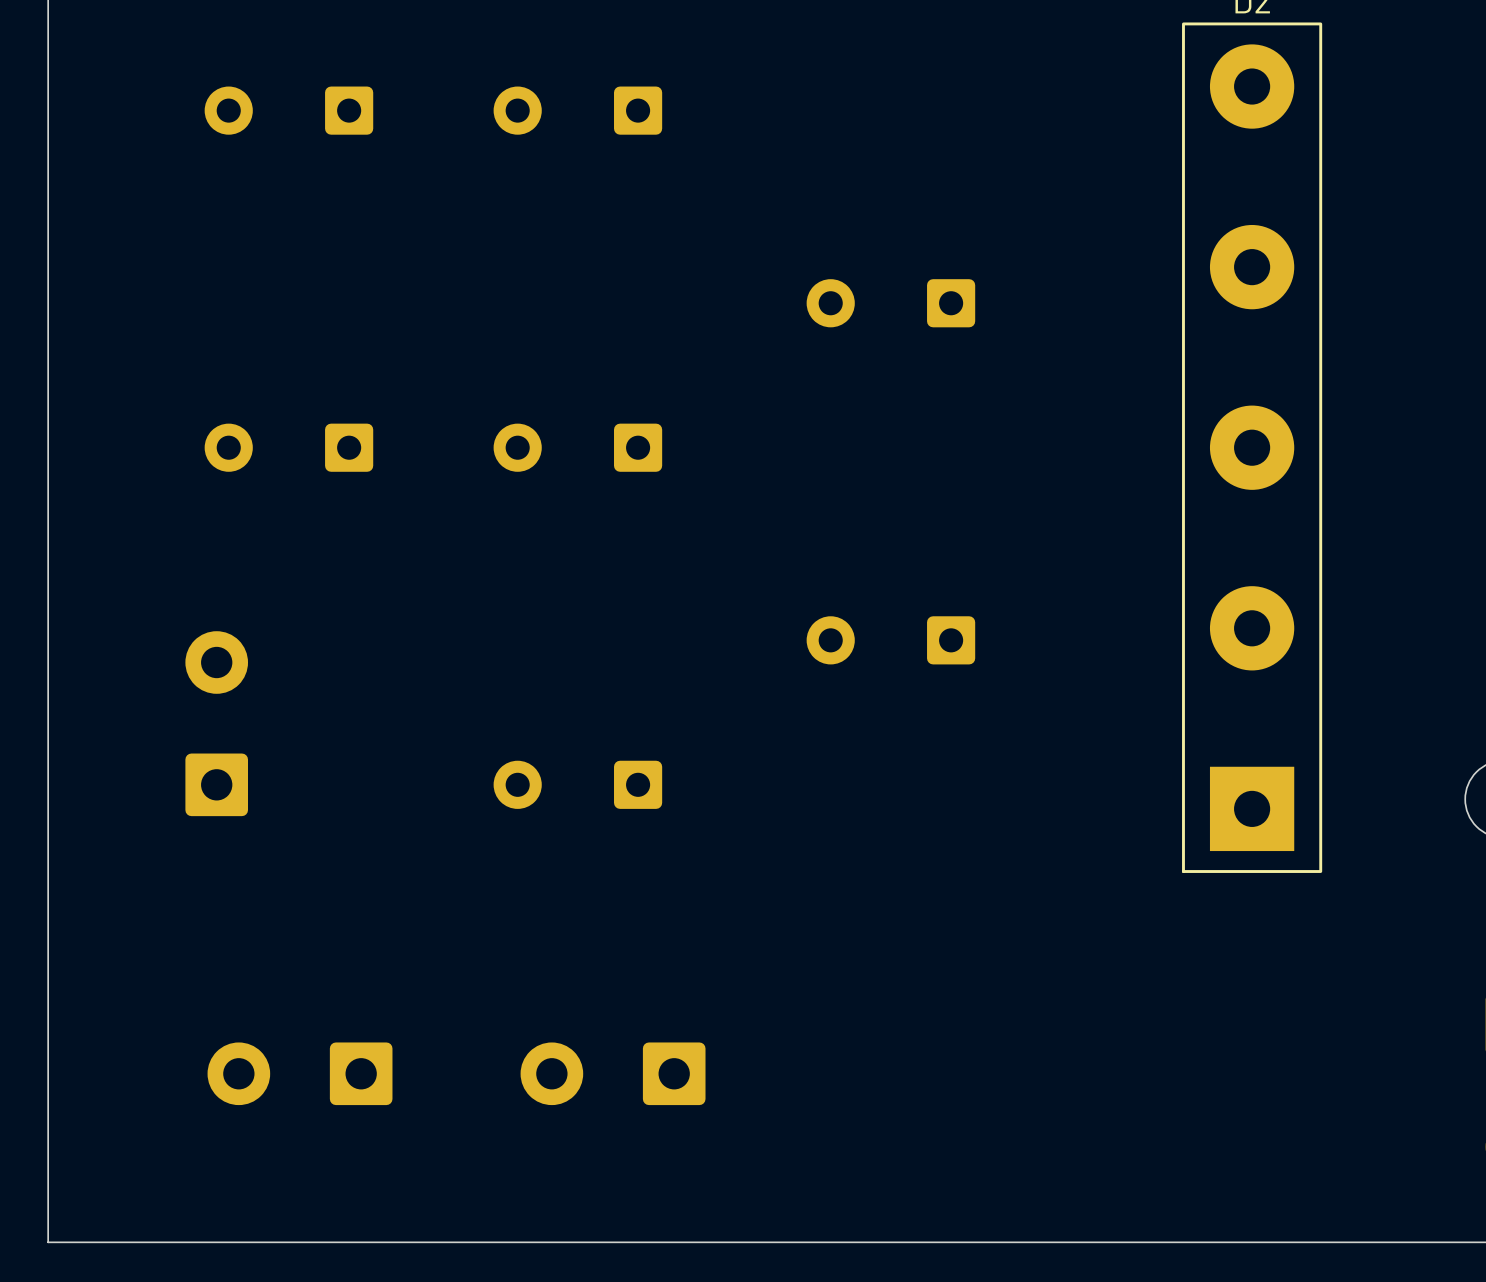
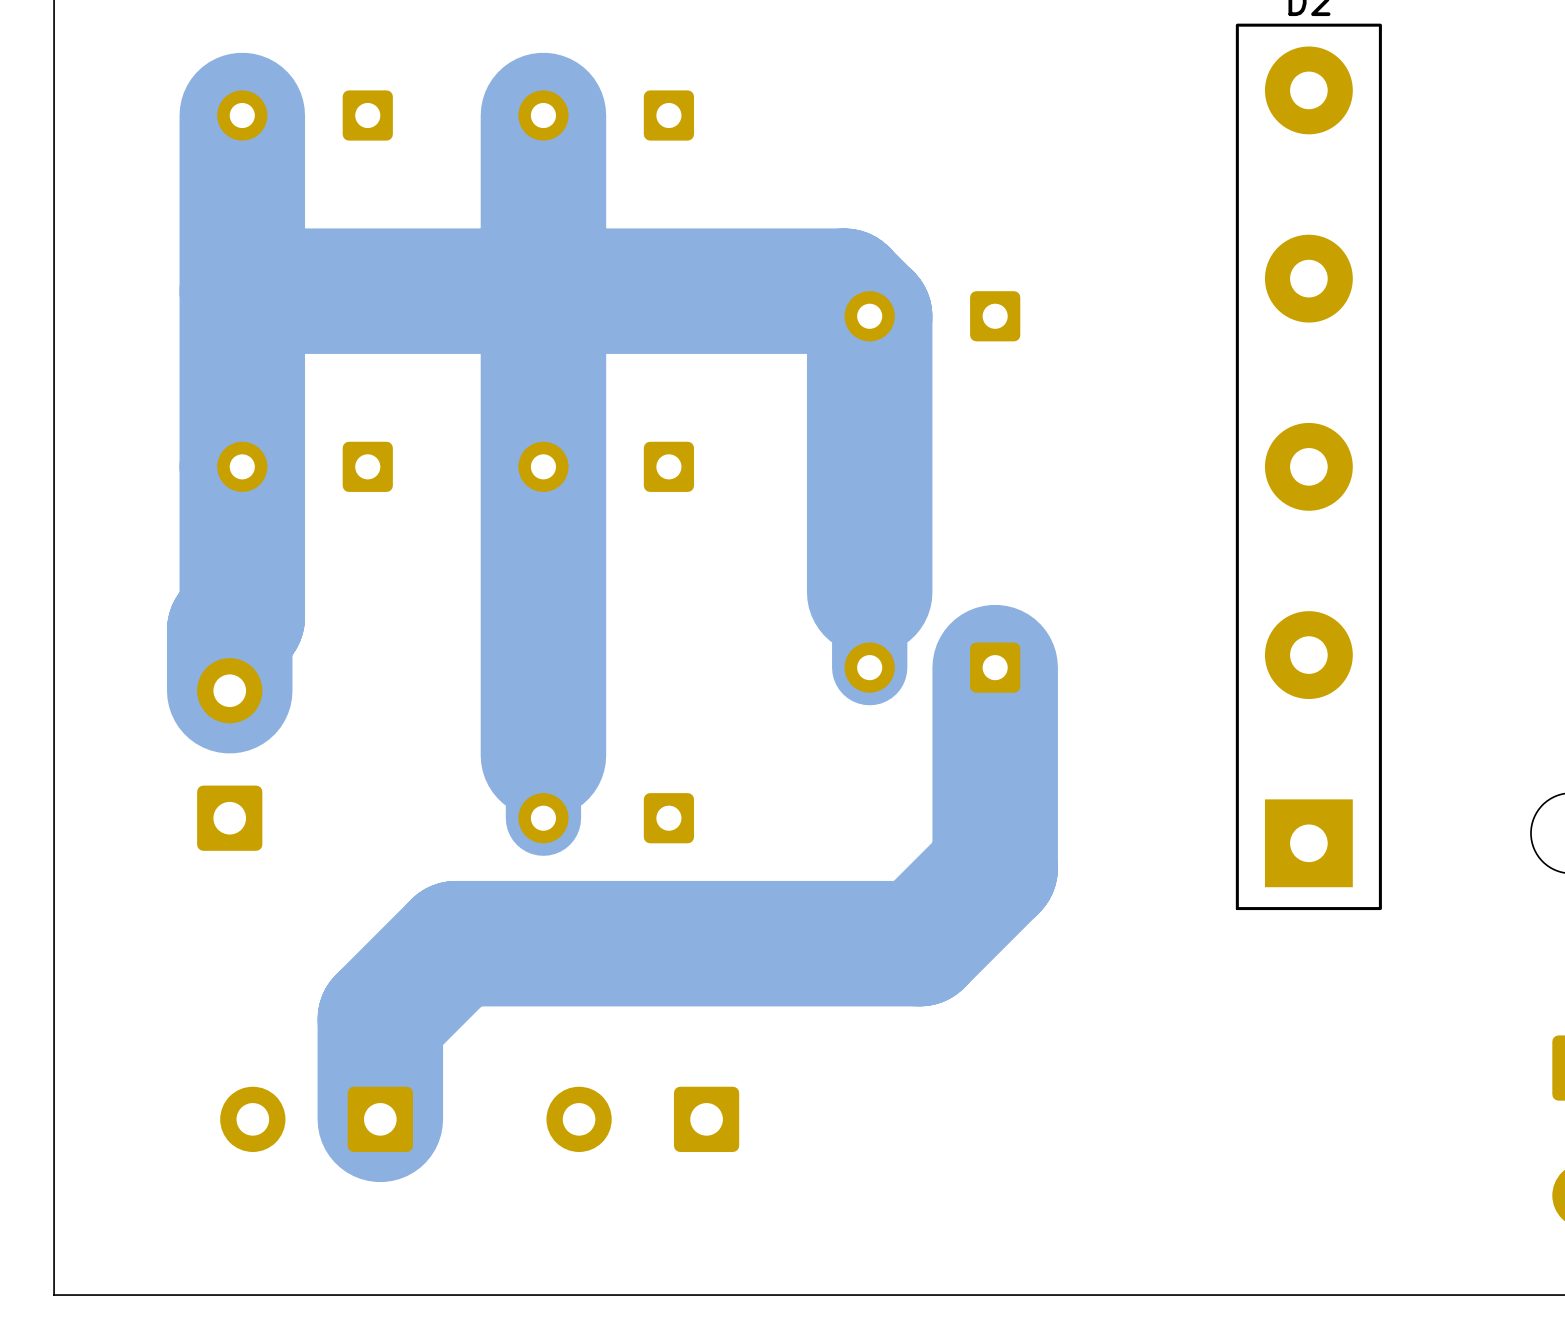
track: none -> (242, 115) (242, 617) (229, 629) (229, 690)
track: none -> (543, 115) (543, 818)
track: none -> (242, 291) (844, 291) (869, 316) (869, 667)
track: none -> (995, 667) (995, 868) (919, 943) (455, 943) (380, 1018) (380, 1119)

